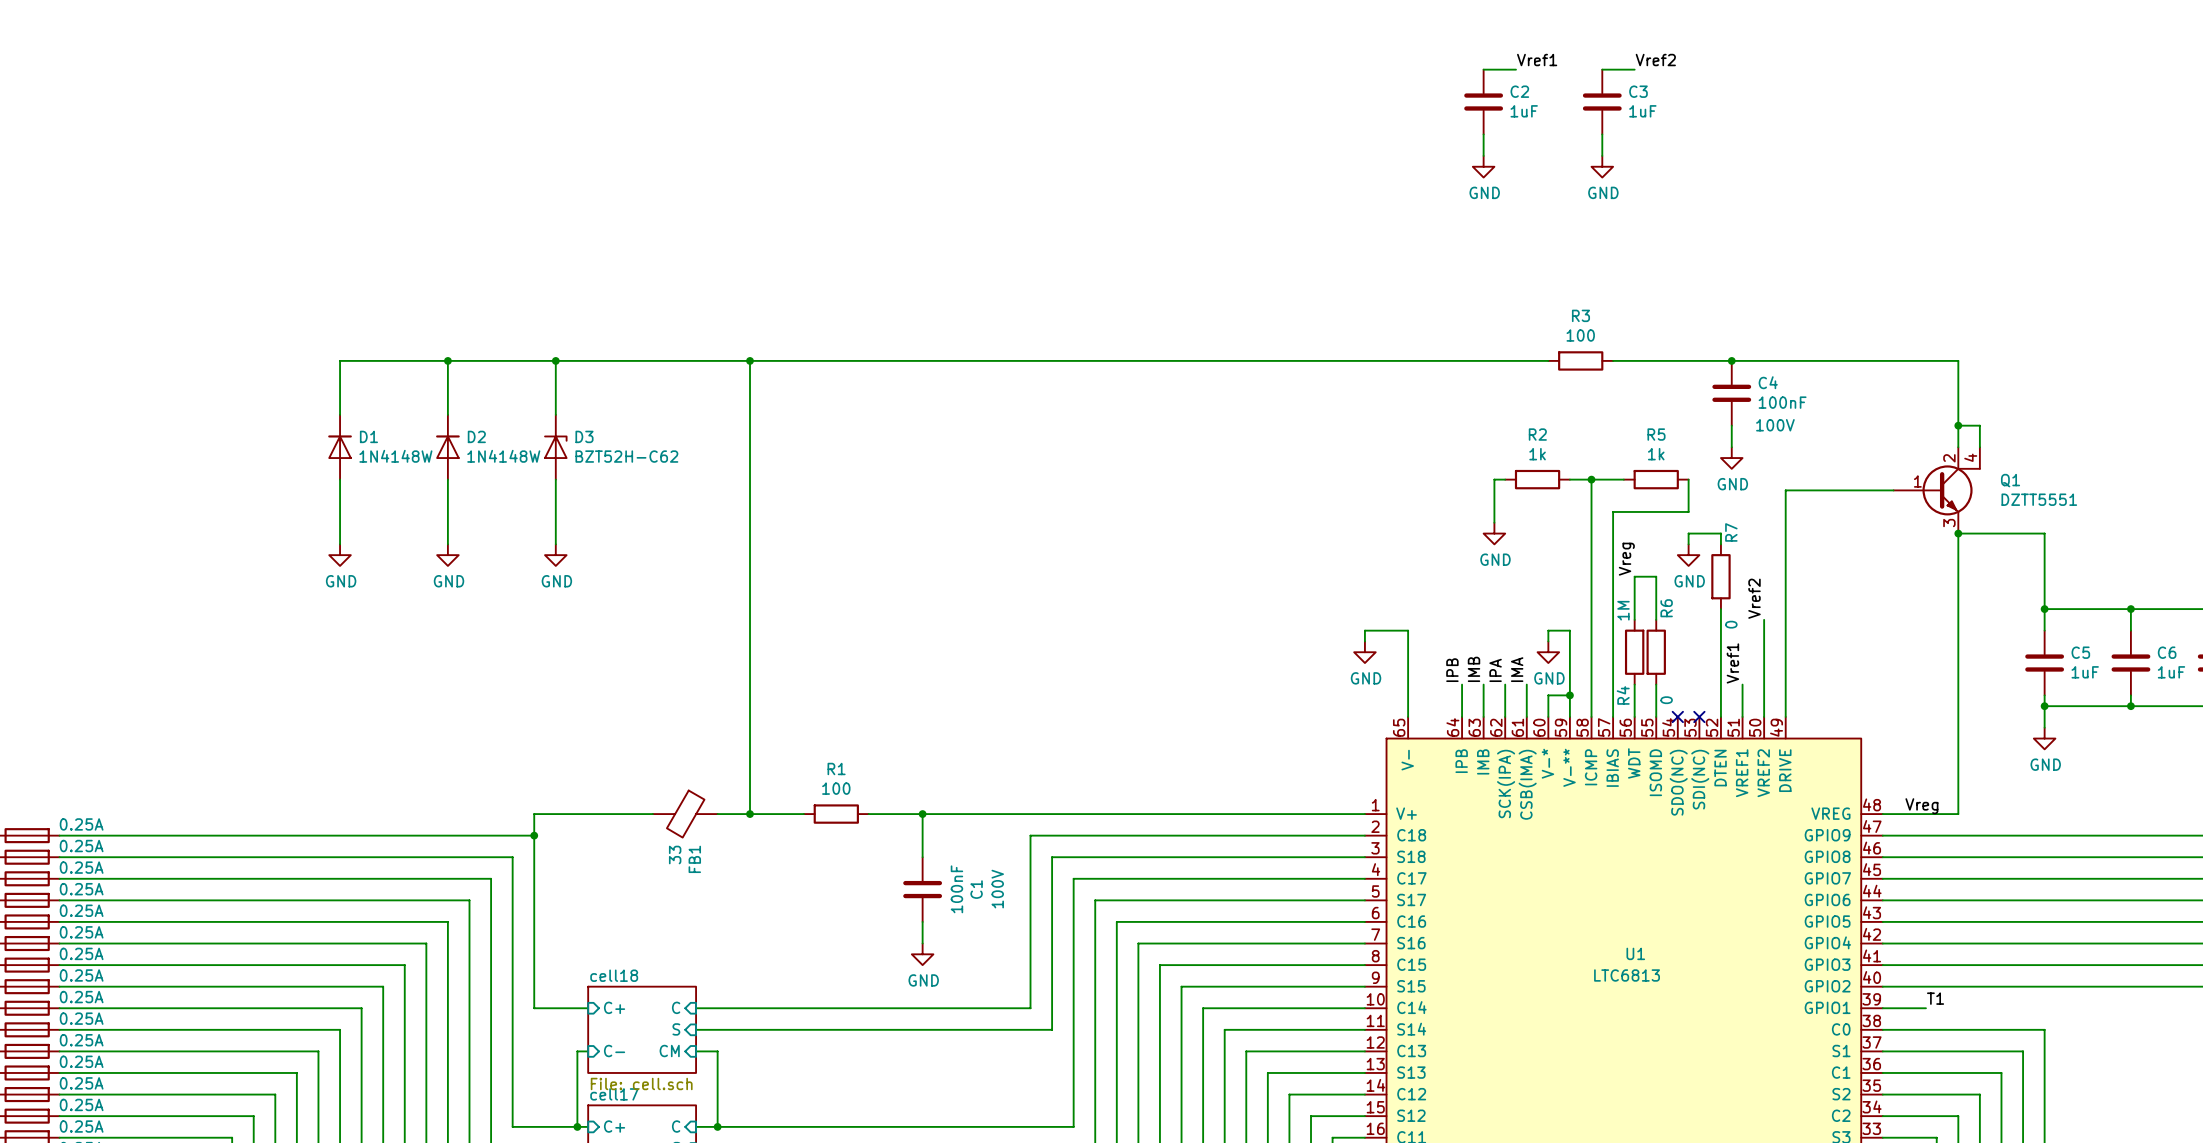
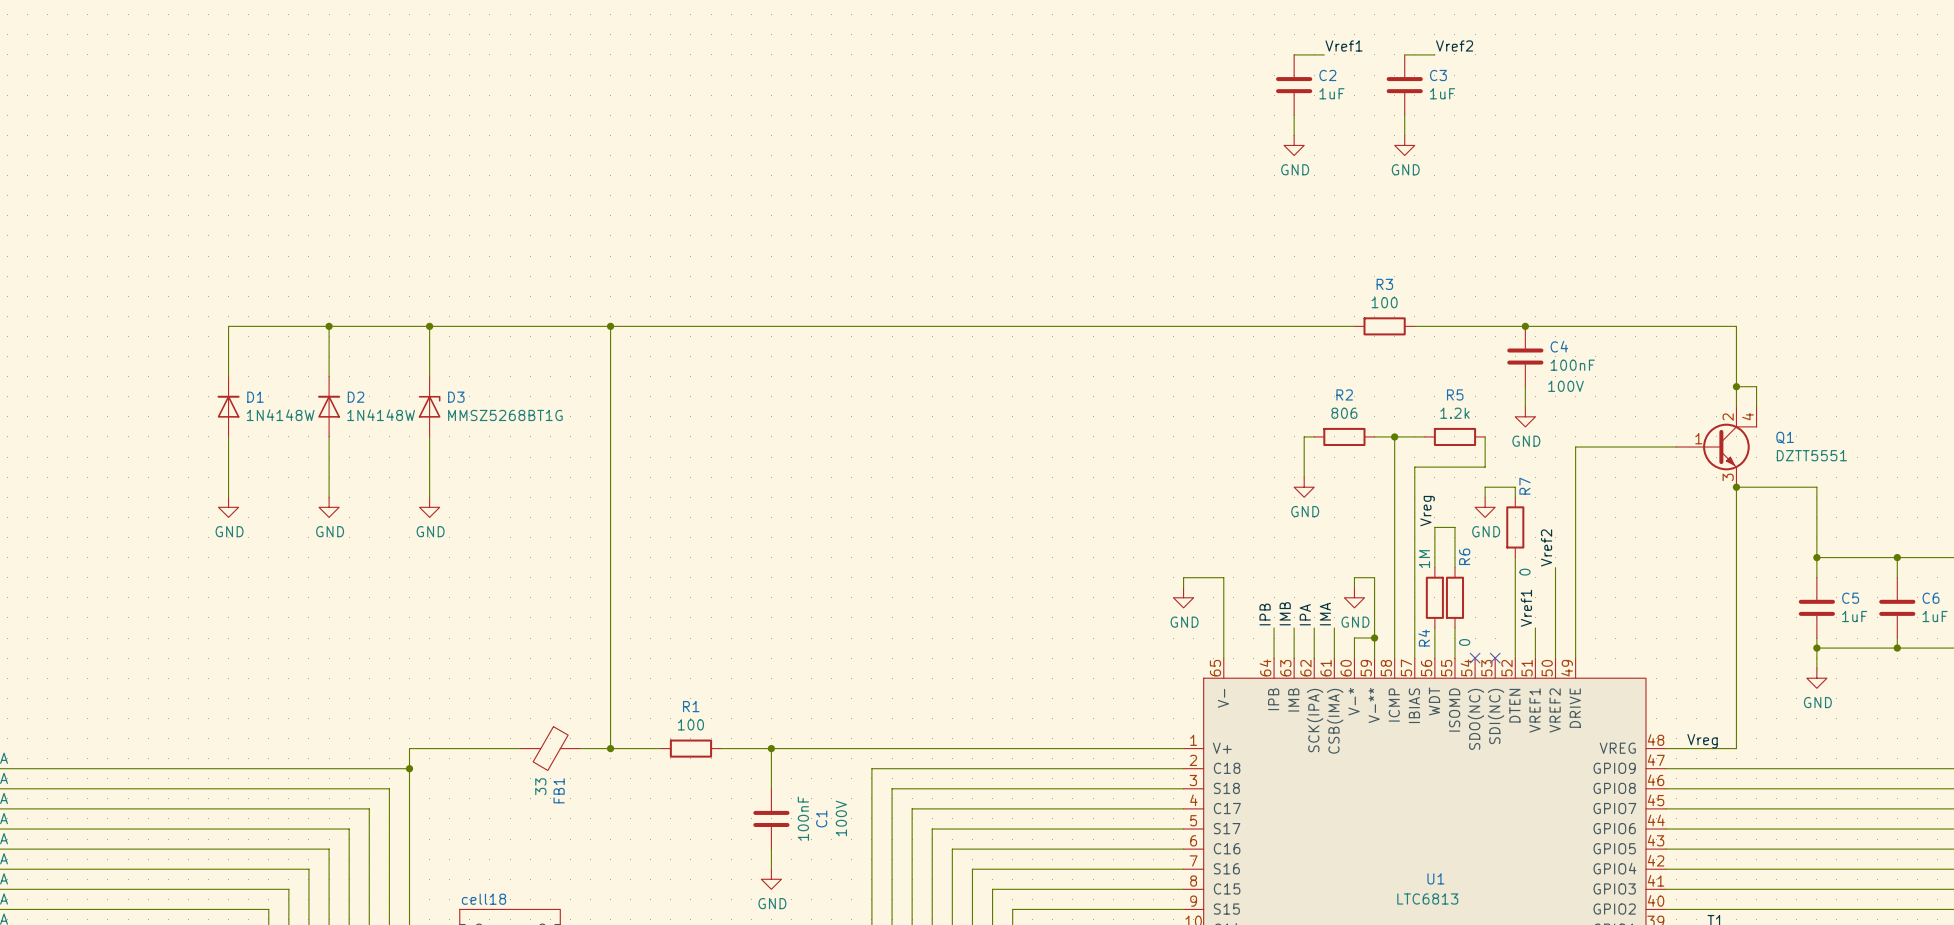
R2 value: 1k (1537, 454) -> 806 (1344, 413)
R5 value: 1k (1656, 454) -> 1.2k (1454, 413)
D3 value: BZT52H-C62 (626, 456) -> MMSZ5268BT1G (505, 415)

